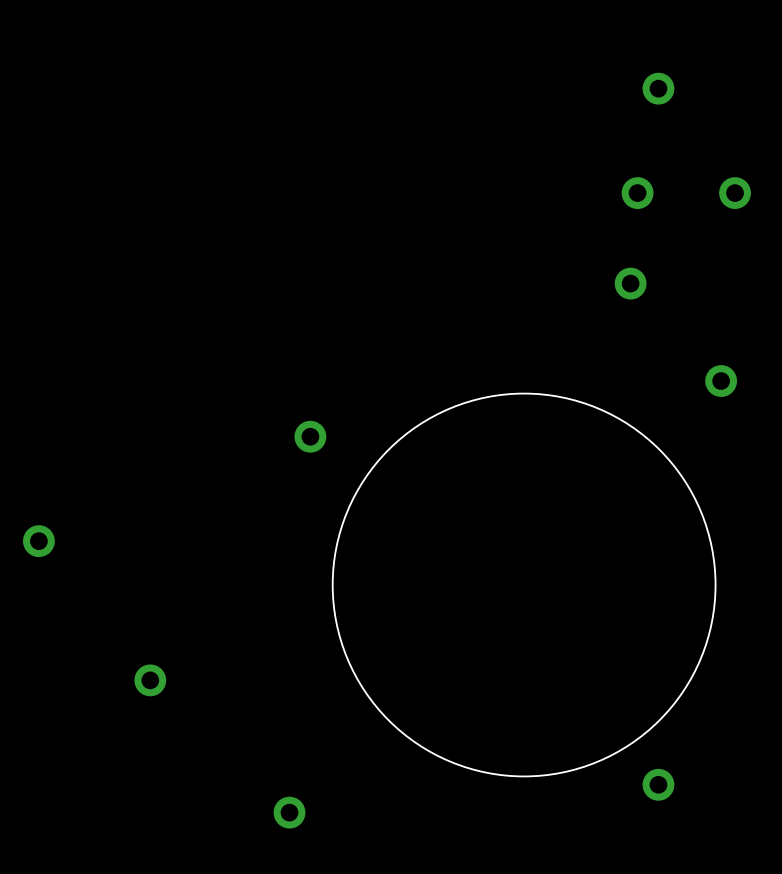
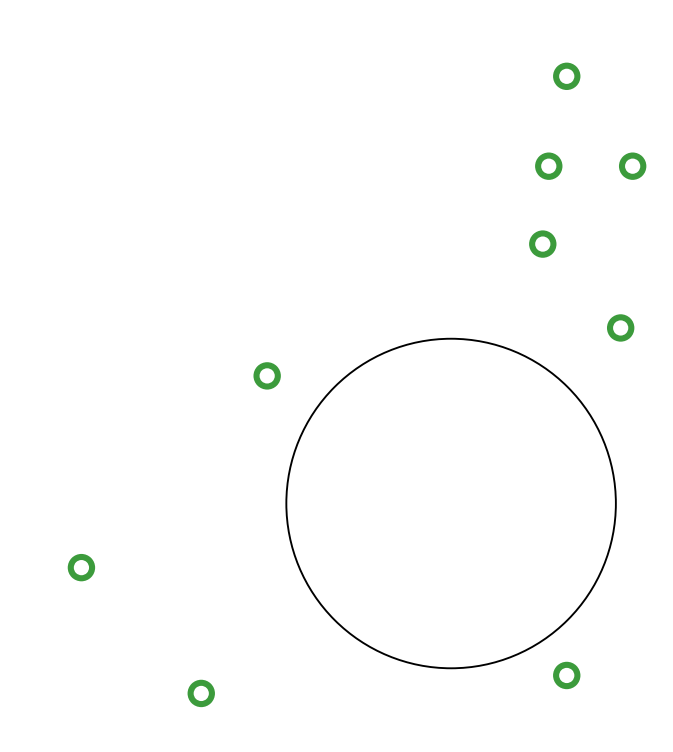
via: (38, 541) -> none
via position: (150, 680) -> (81, 567)
via position: (289, 812) -> (201, 693)

